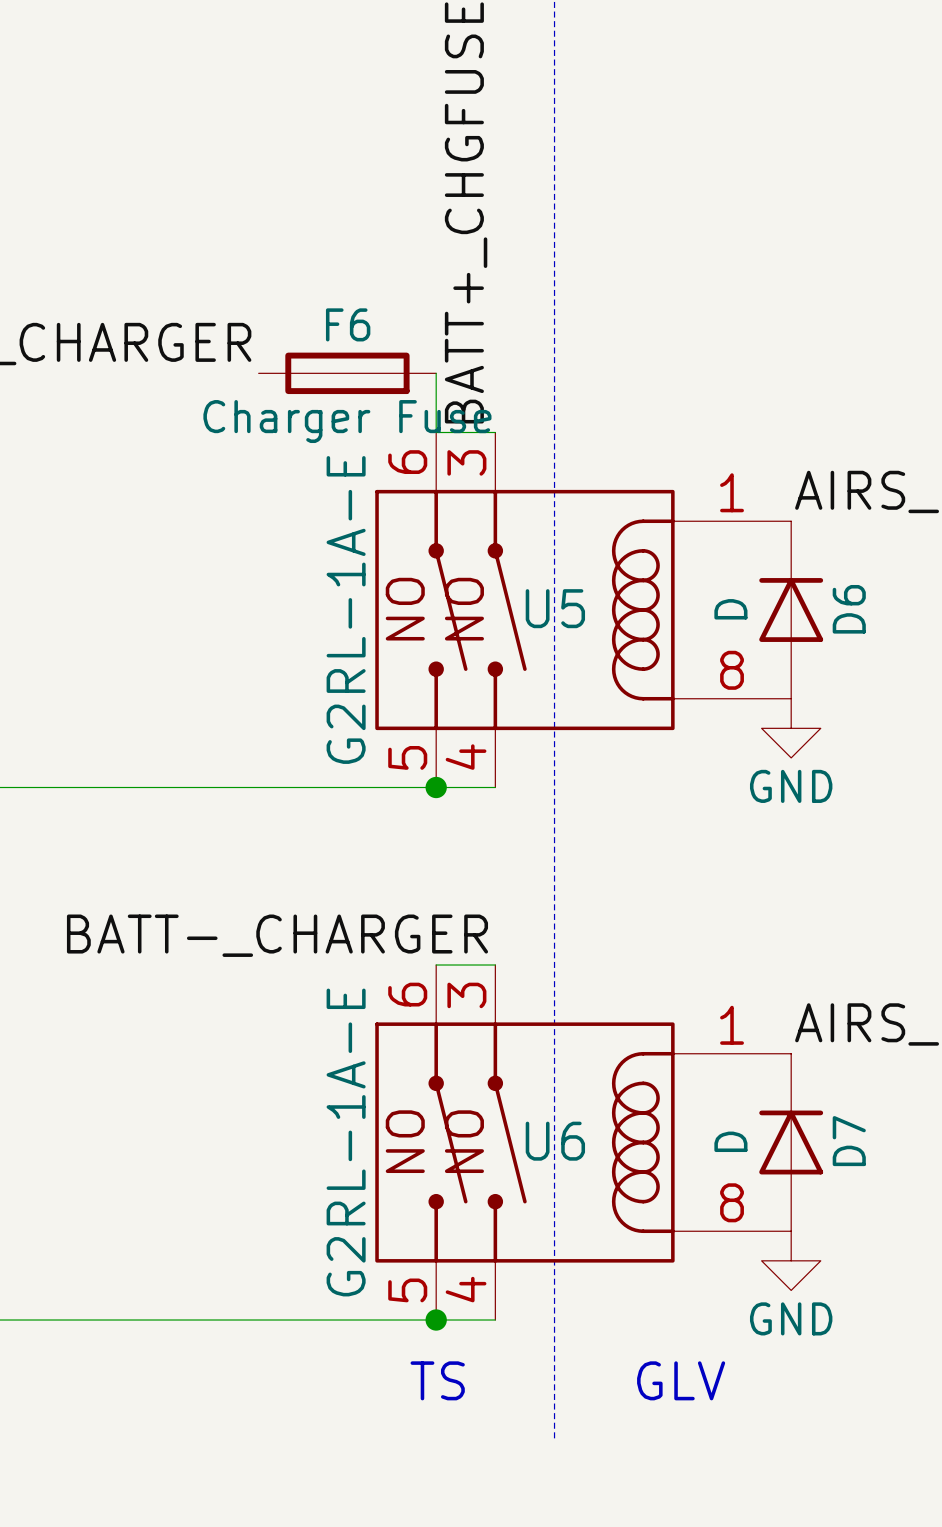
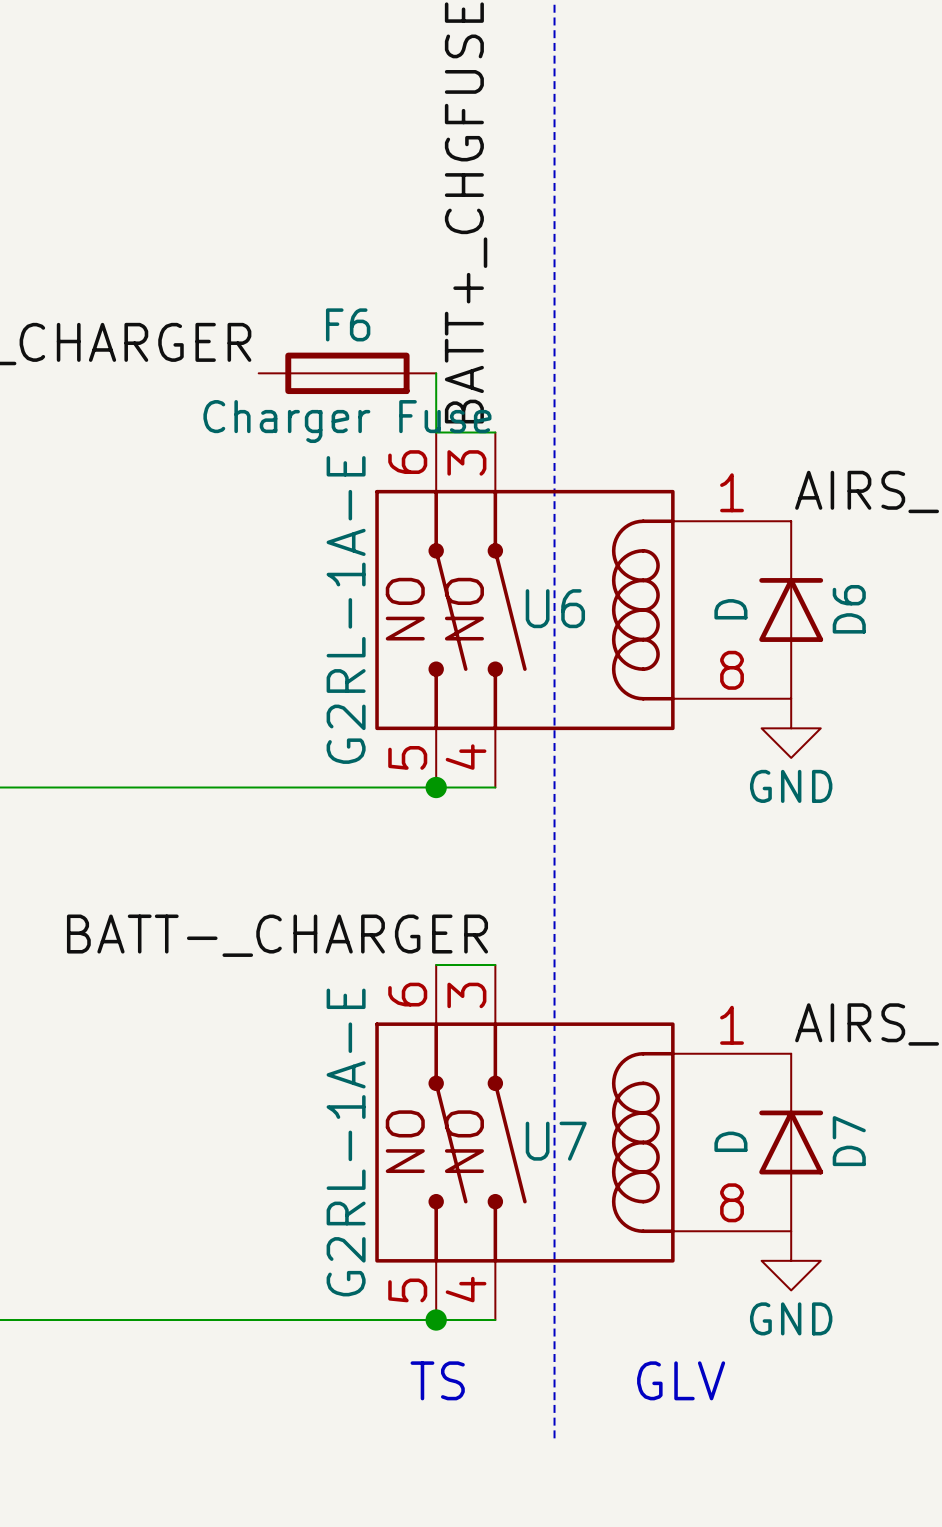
U5 name: U5 (555, 608) -> U6 (555, 608)
U6 name: U6 (555, 1141) -> U7 (556, 1141)

